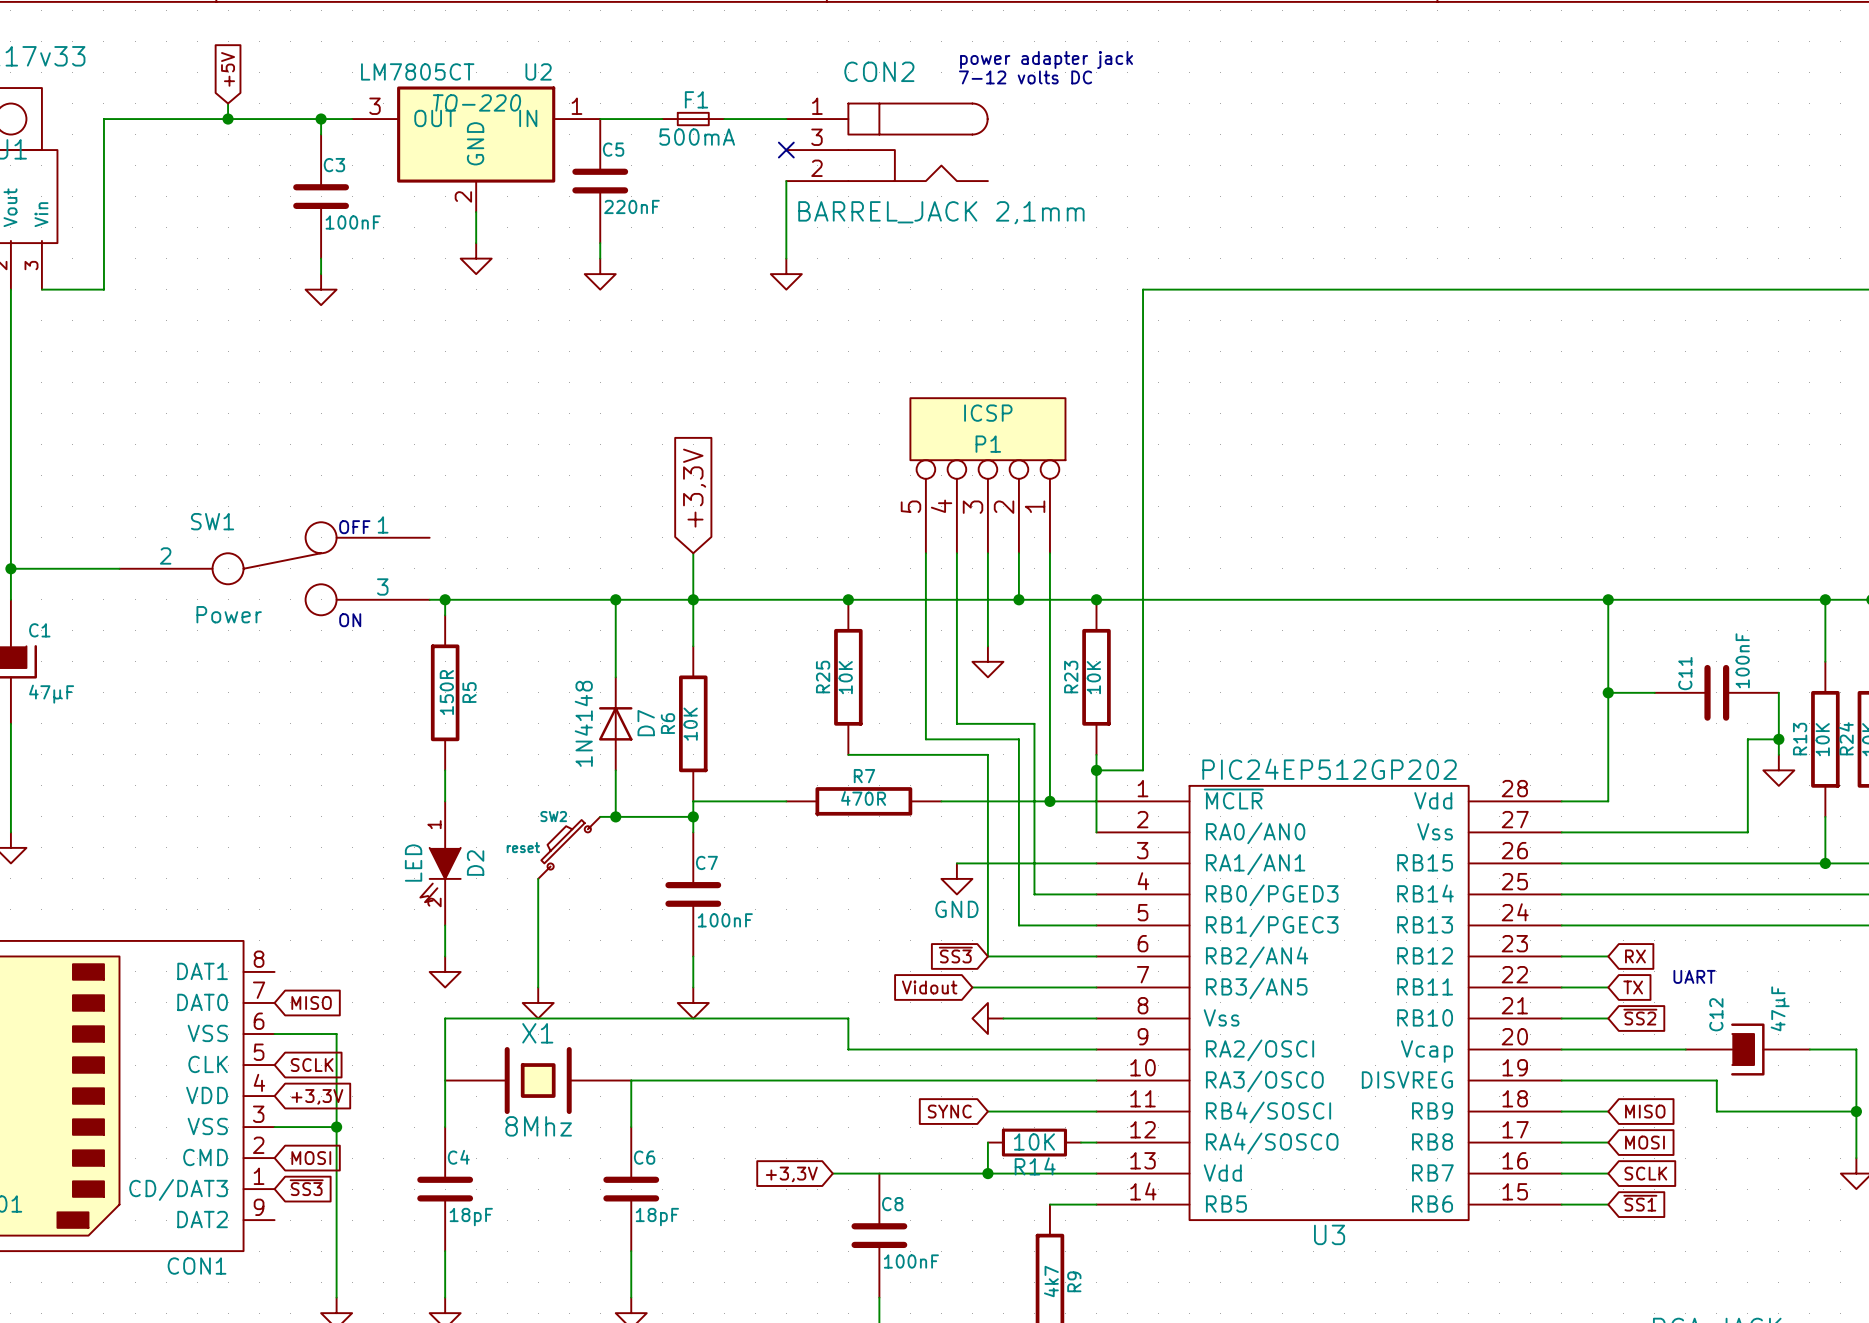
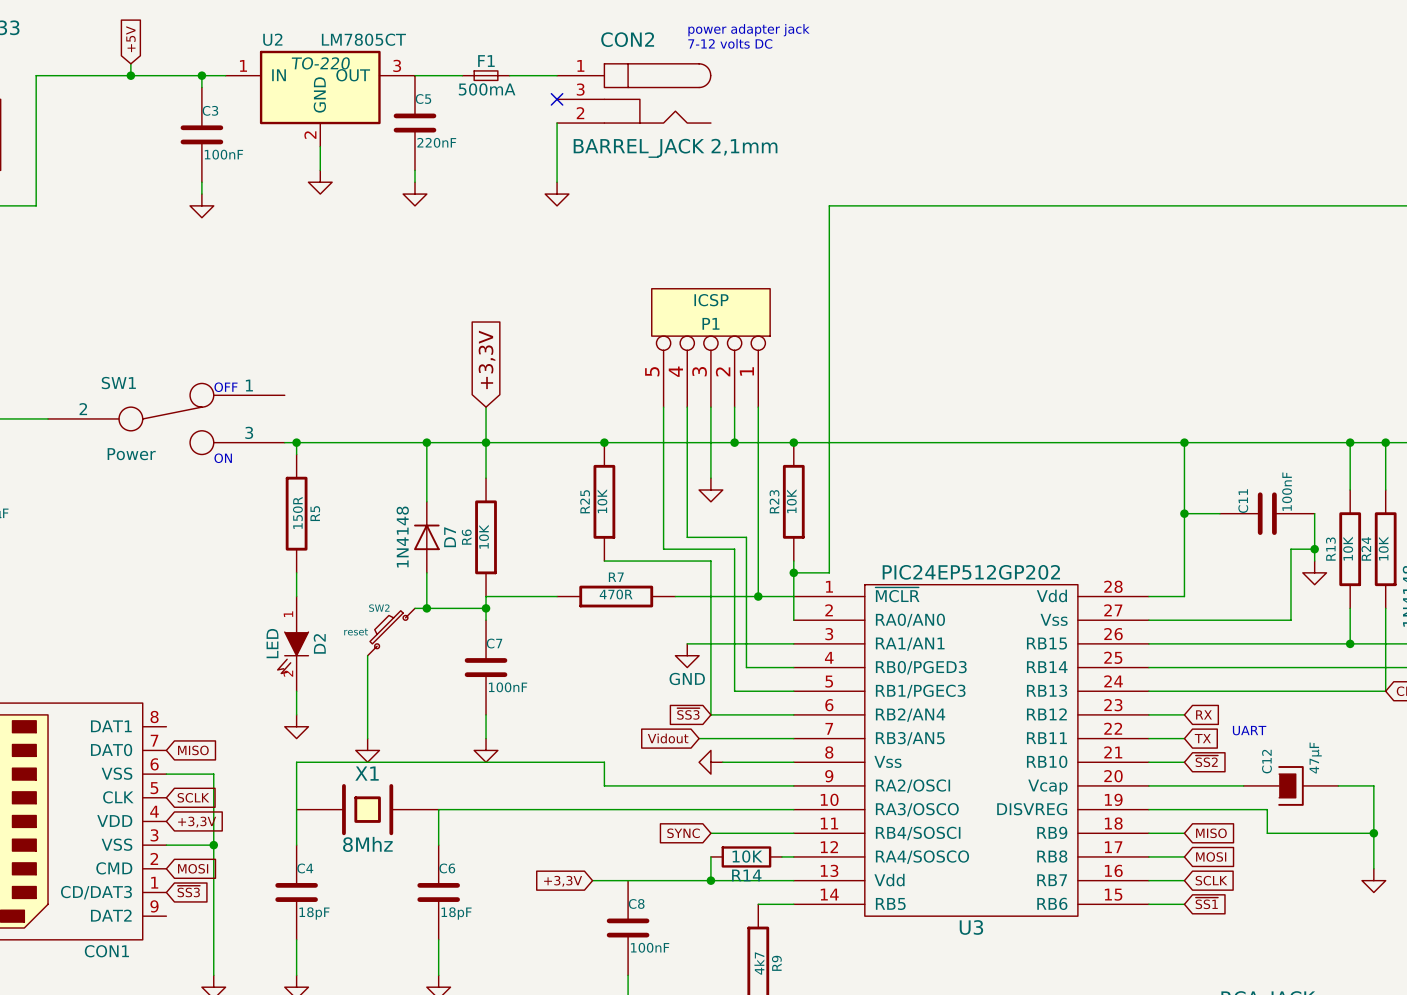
U2 flip: as is (476, 134) -> left-right (320, 87)

